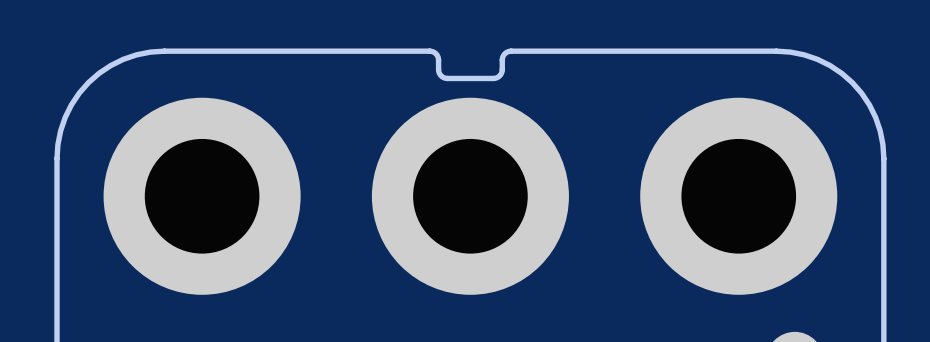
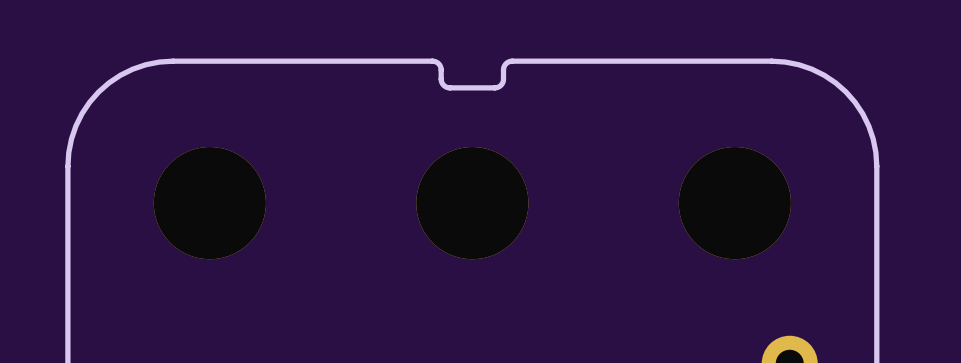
part footprint: [103, 97, 301, 295] -> [153, 147, 266, 260]
part footprint: [371, 97, 569, 295] -> [416, 147, 529, 260]
part footprint: [640, 97, 838, 295] -> [678, 147, 791, 260]

